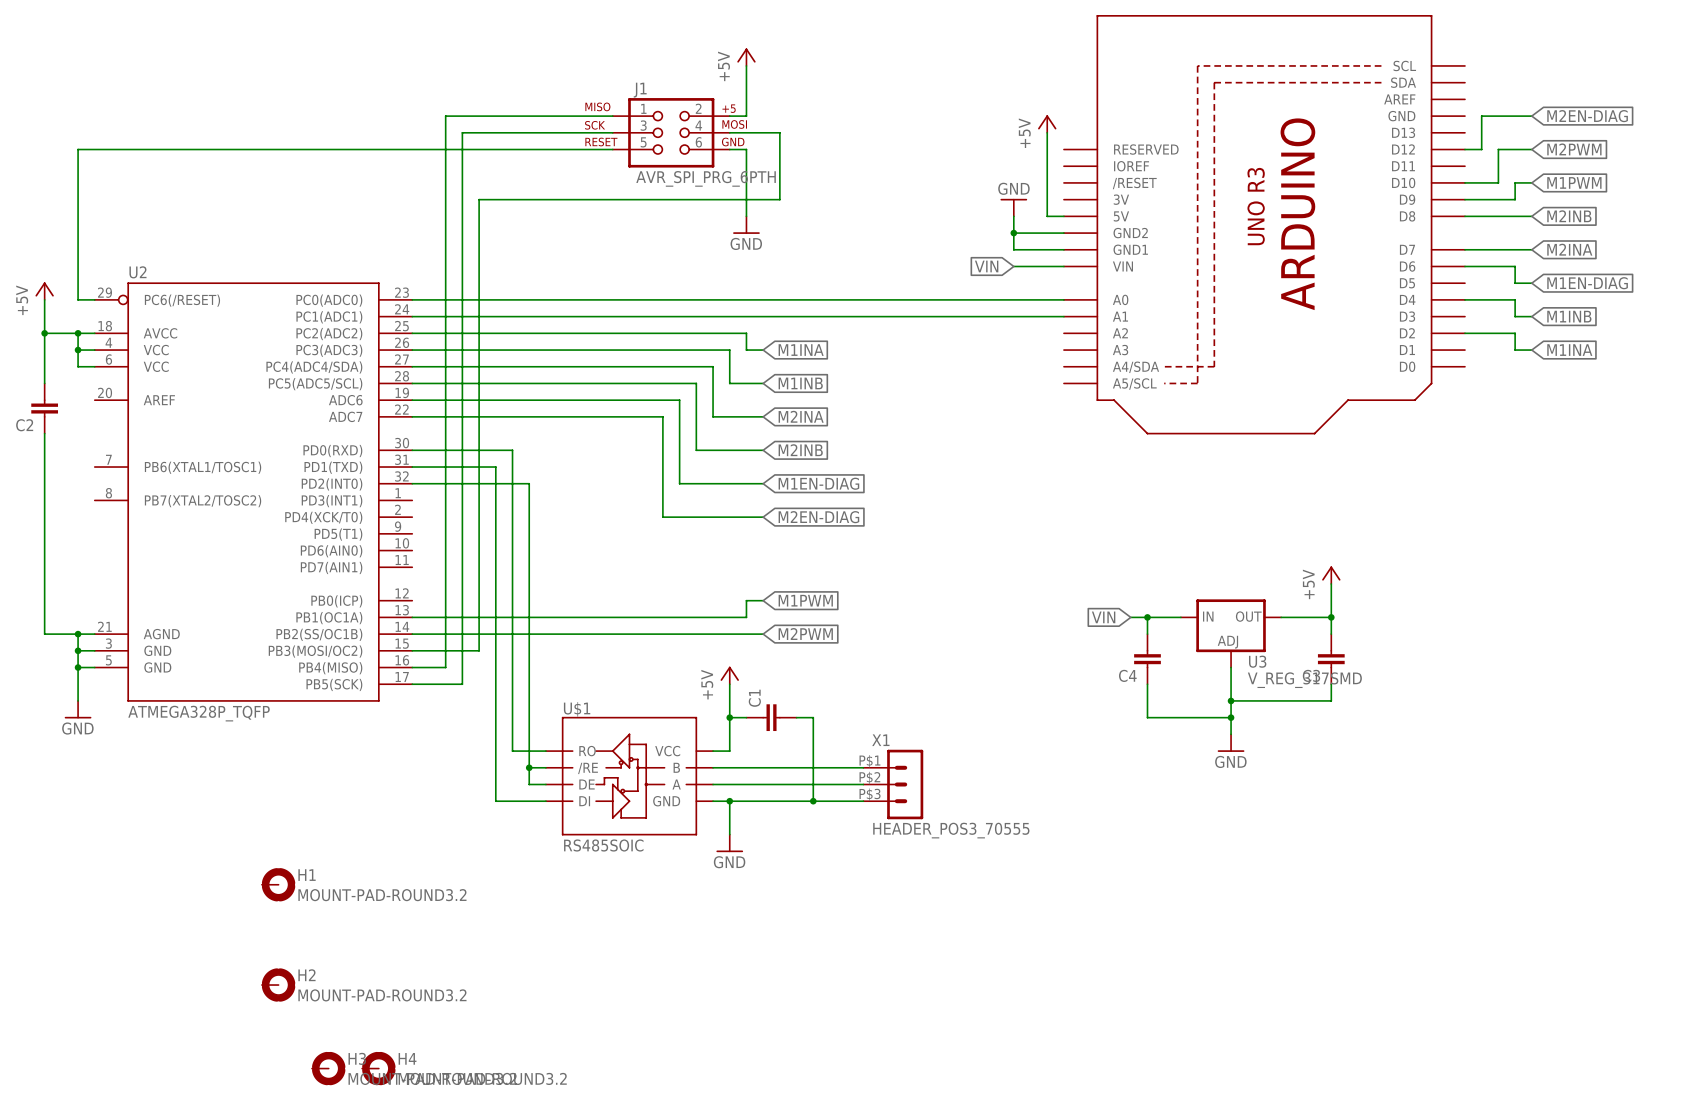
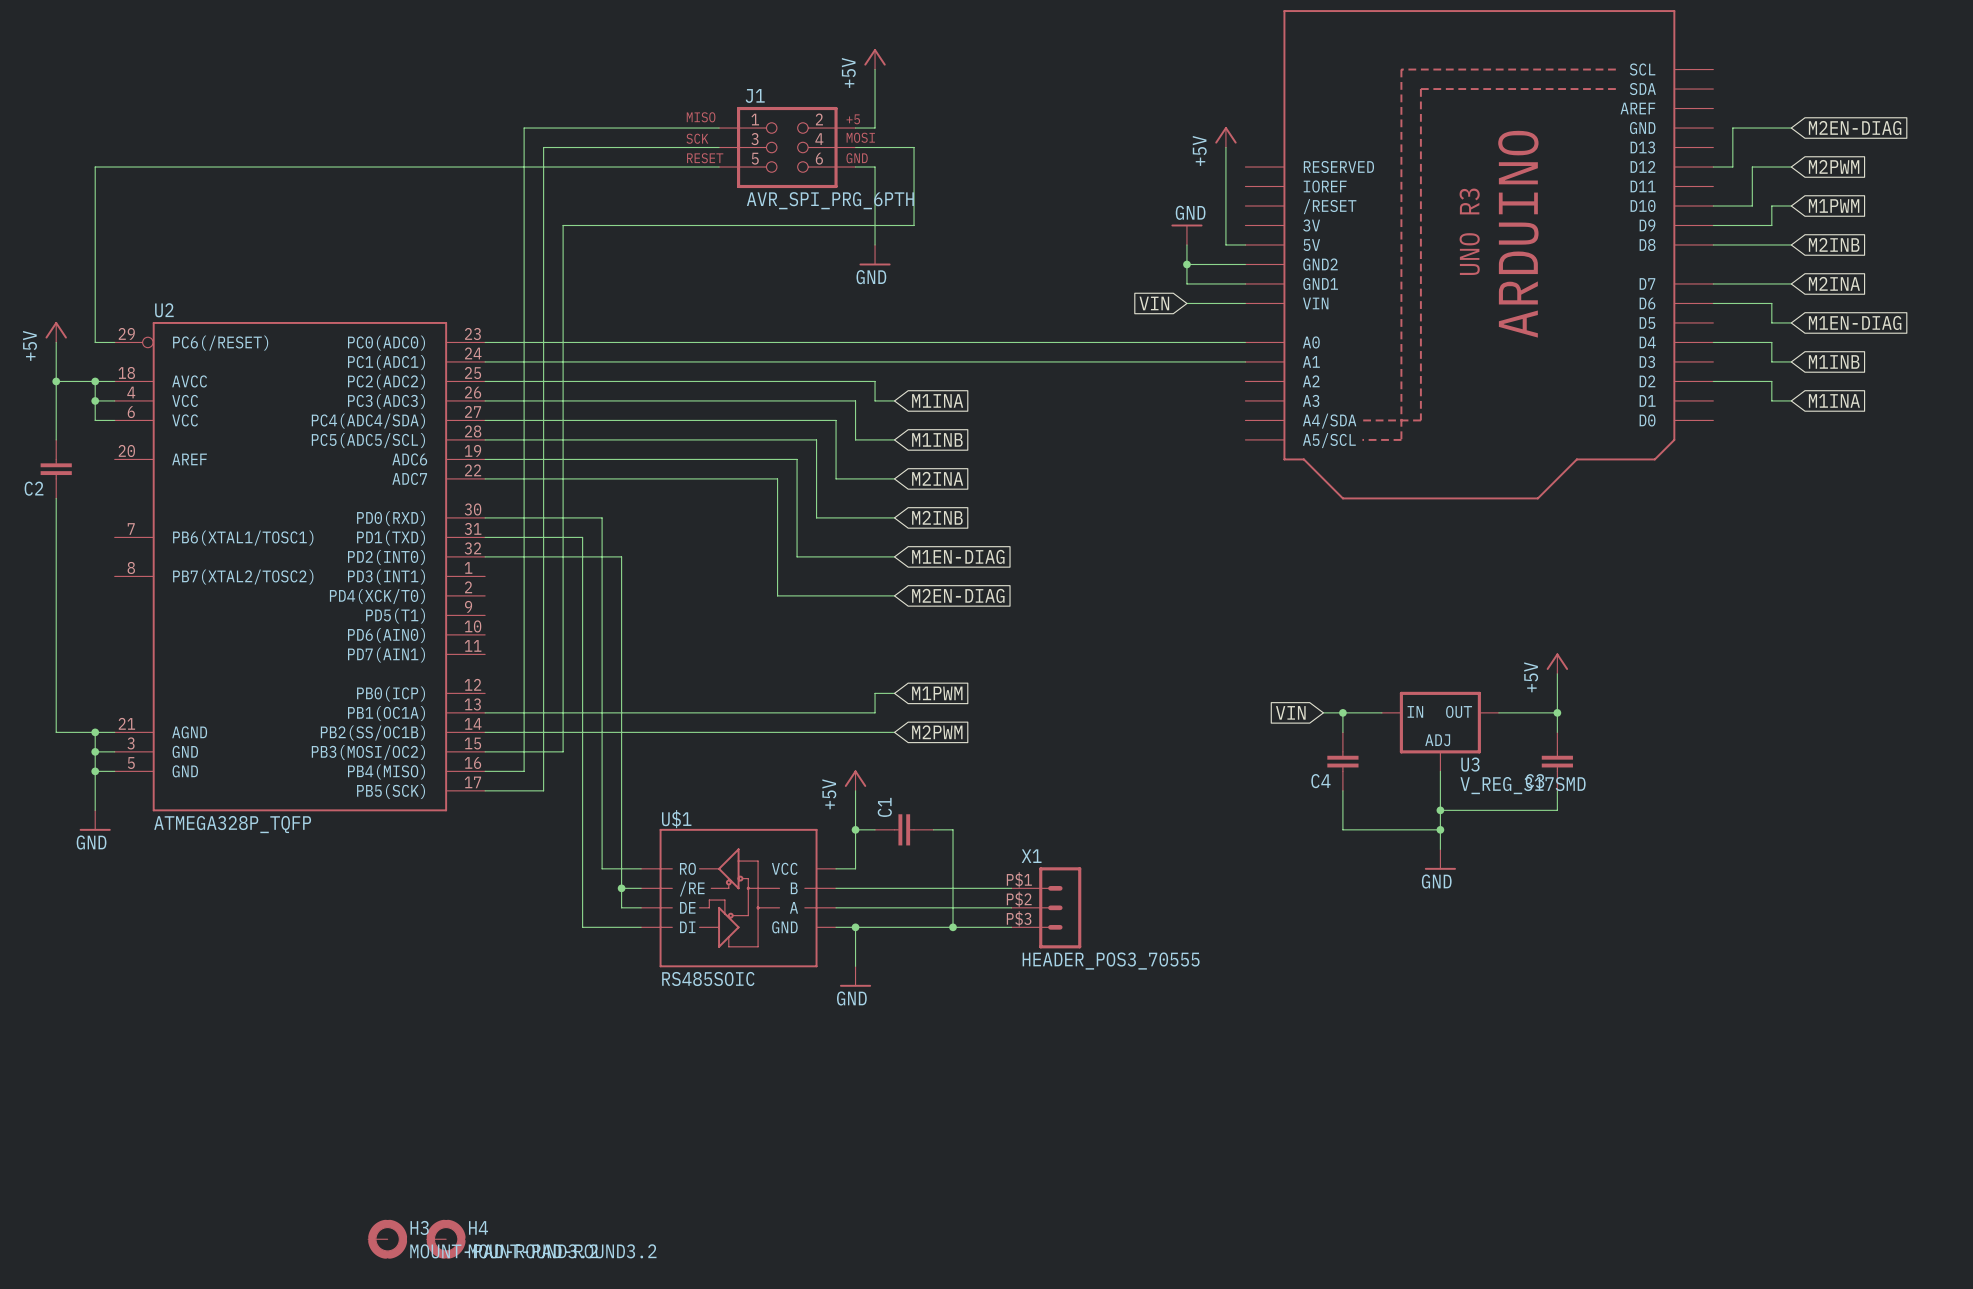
H1: MOUNT-PAD-ROUND3.2 (278, 884) -> none
H2: MOUNT-PAD-ROUND3.2 (278, 985) -> none

